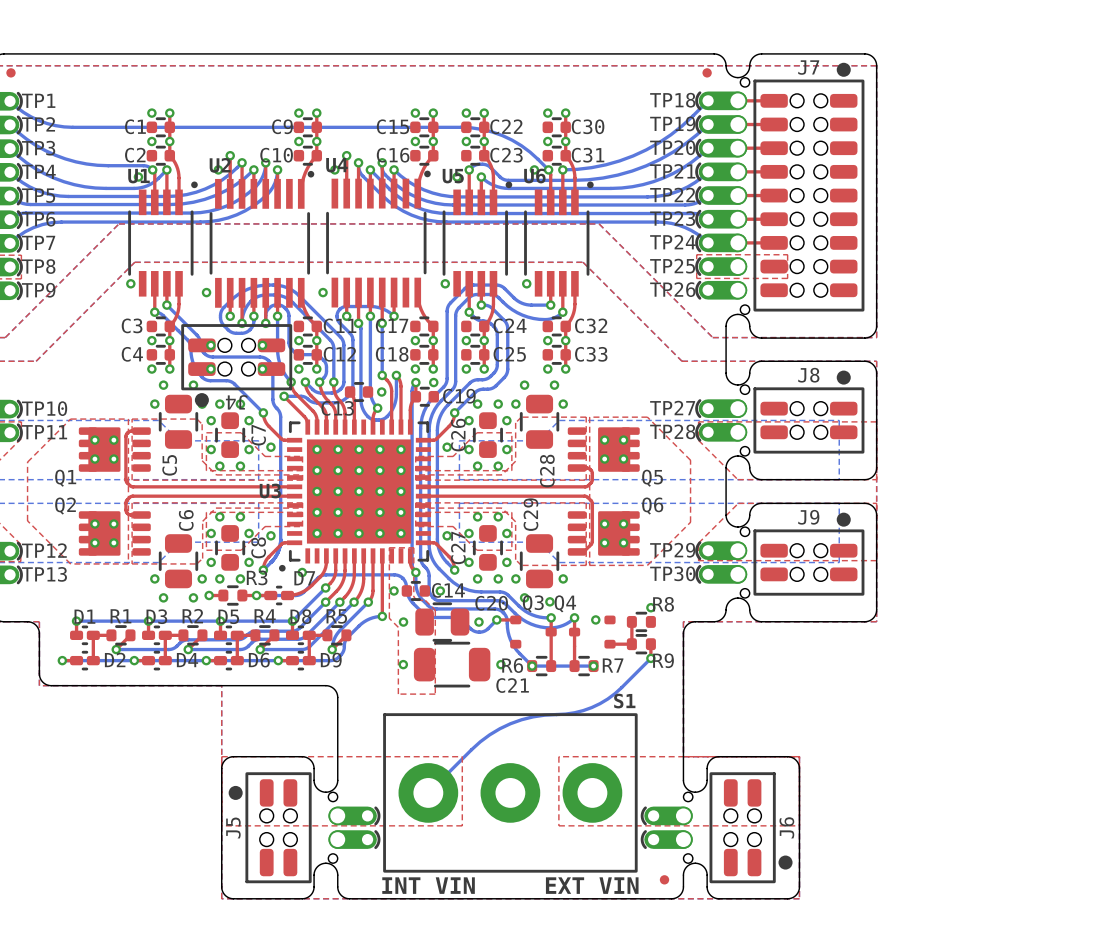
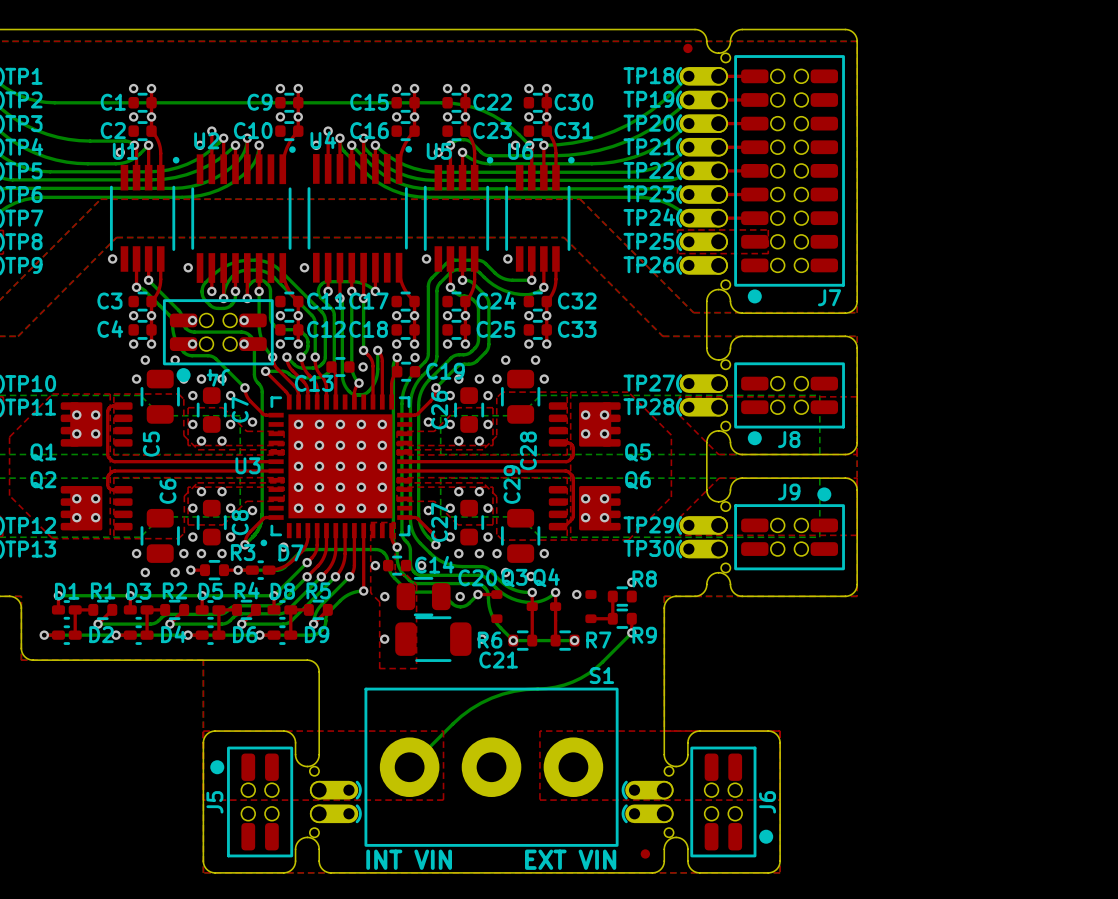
J7 name position: J7 (808, 67) -> J7 (829, 297)
J7 rotation: 0° (808, 187) -> 180° (789, 179)
J8 rotation: 0° (808, 412) -> 180° (789, 403)

